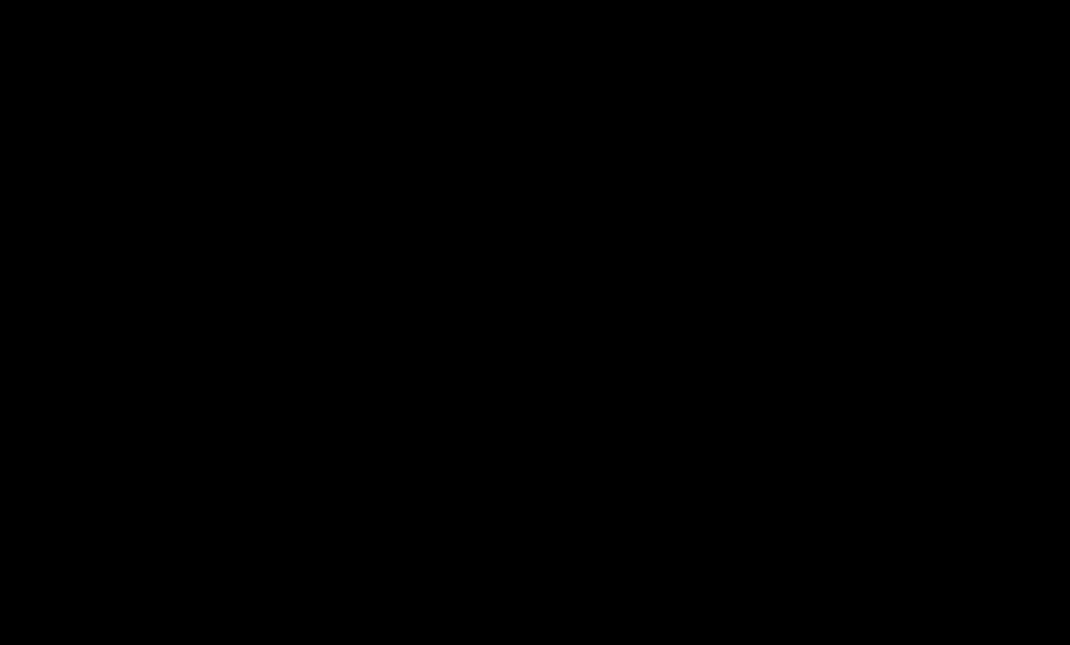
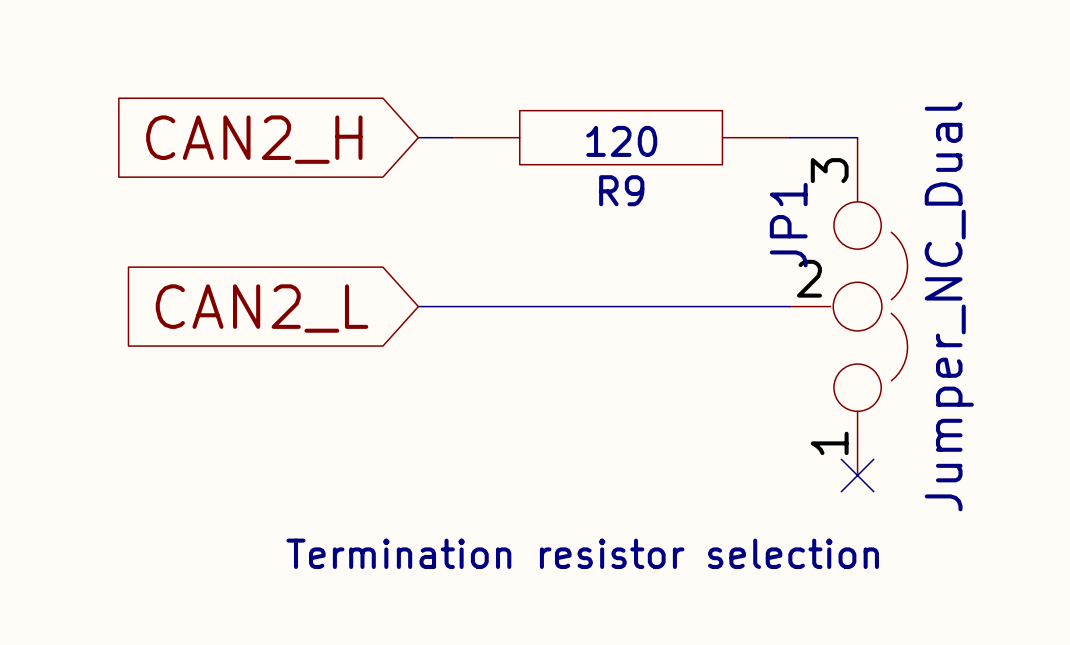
wire: none -> (418, 137) (452, 137)
R9: none -> 120 (621, 137)
wire: none -> (790, 137) (857, 137)
global label: none -> CAN2_H (254, 139)
wire: none -> (418, 306) (790, 306)
JP1: none -> Jumper_NC_Dual (848, 306)
global label: none -> CAN2_L (262, 308)
no-connect mark: none -> (857, 475)
text: none -> Termination resistor selection (582, 553)

